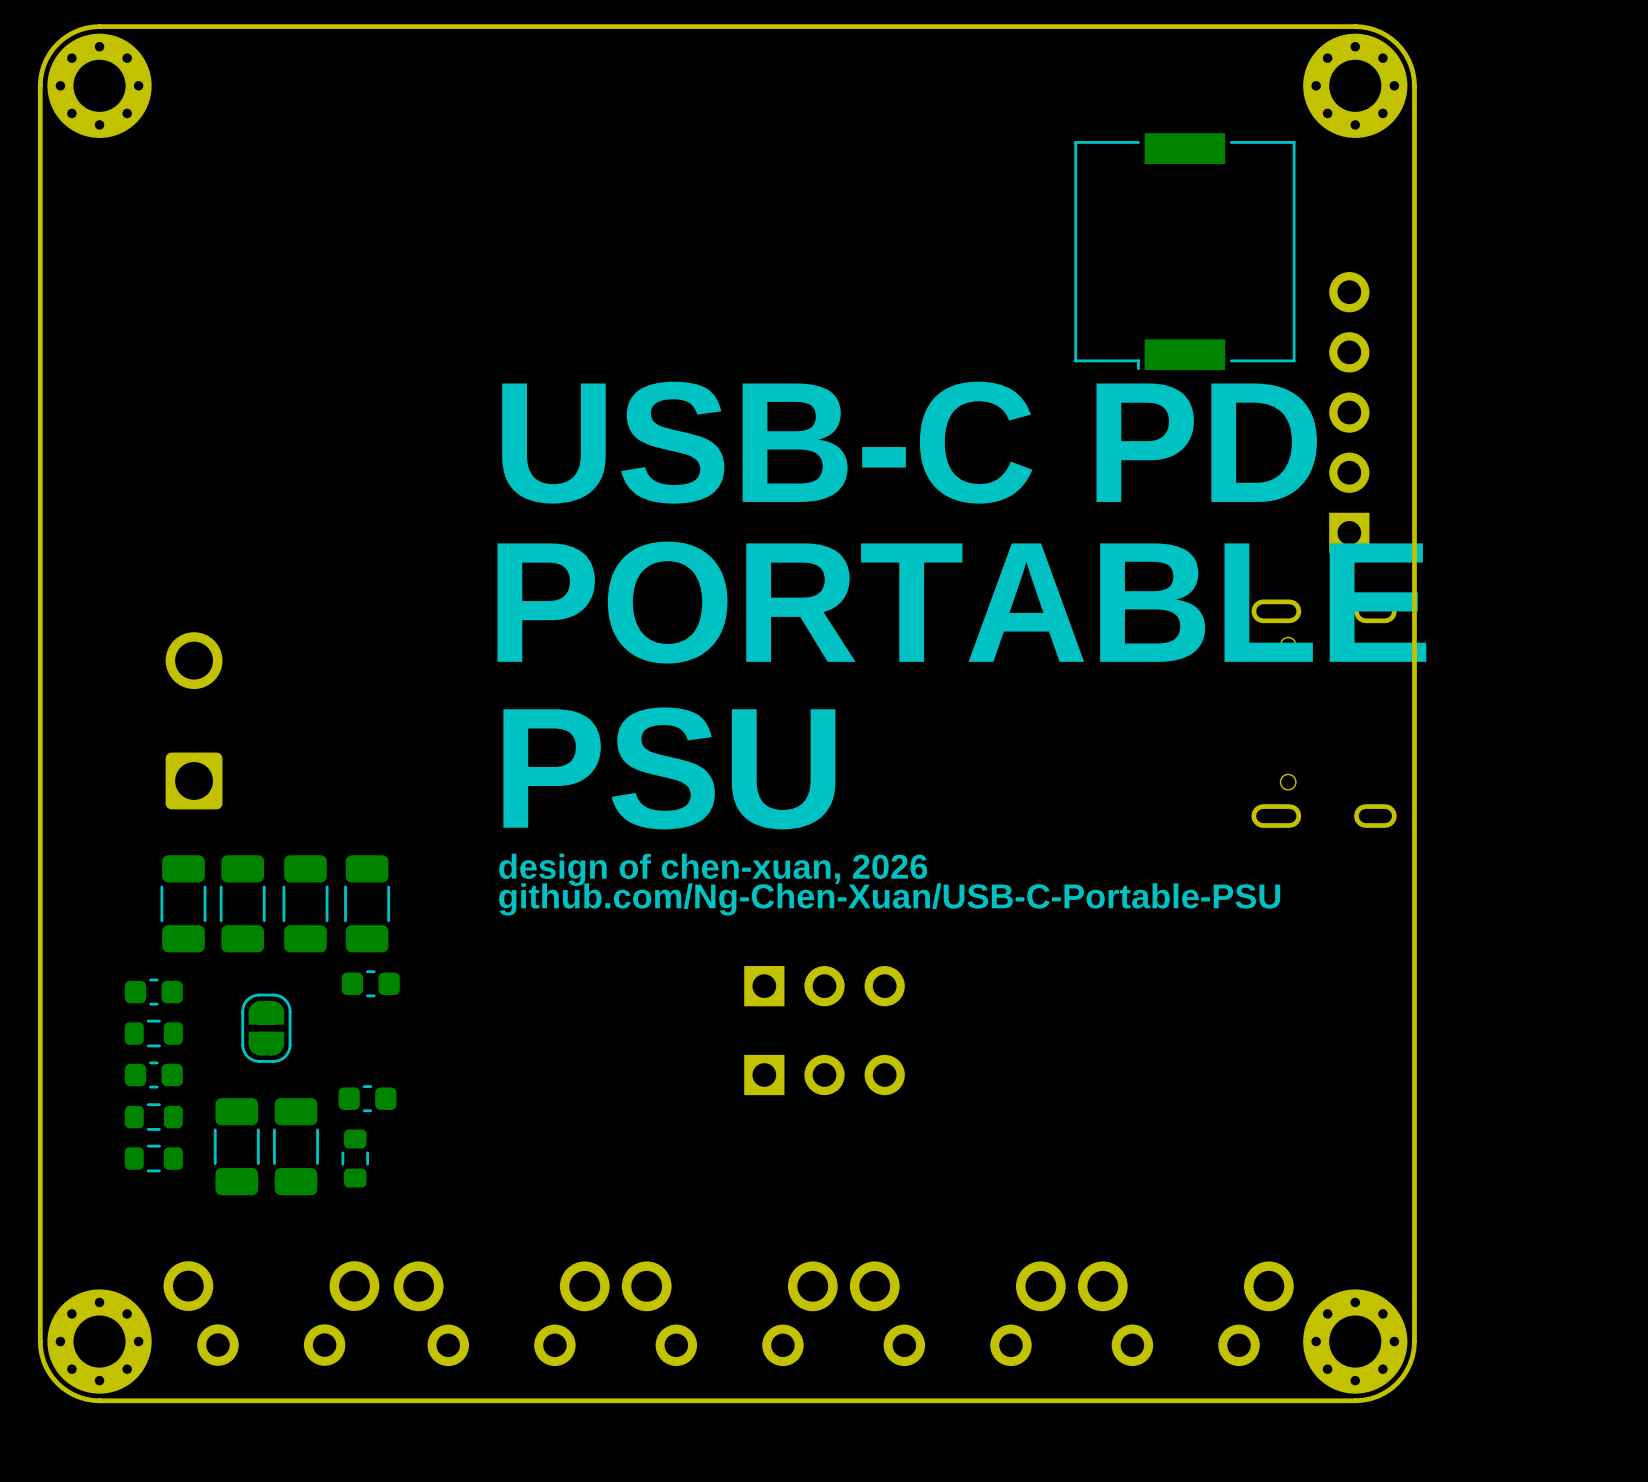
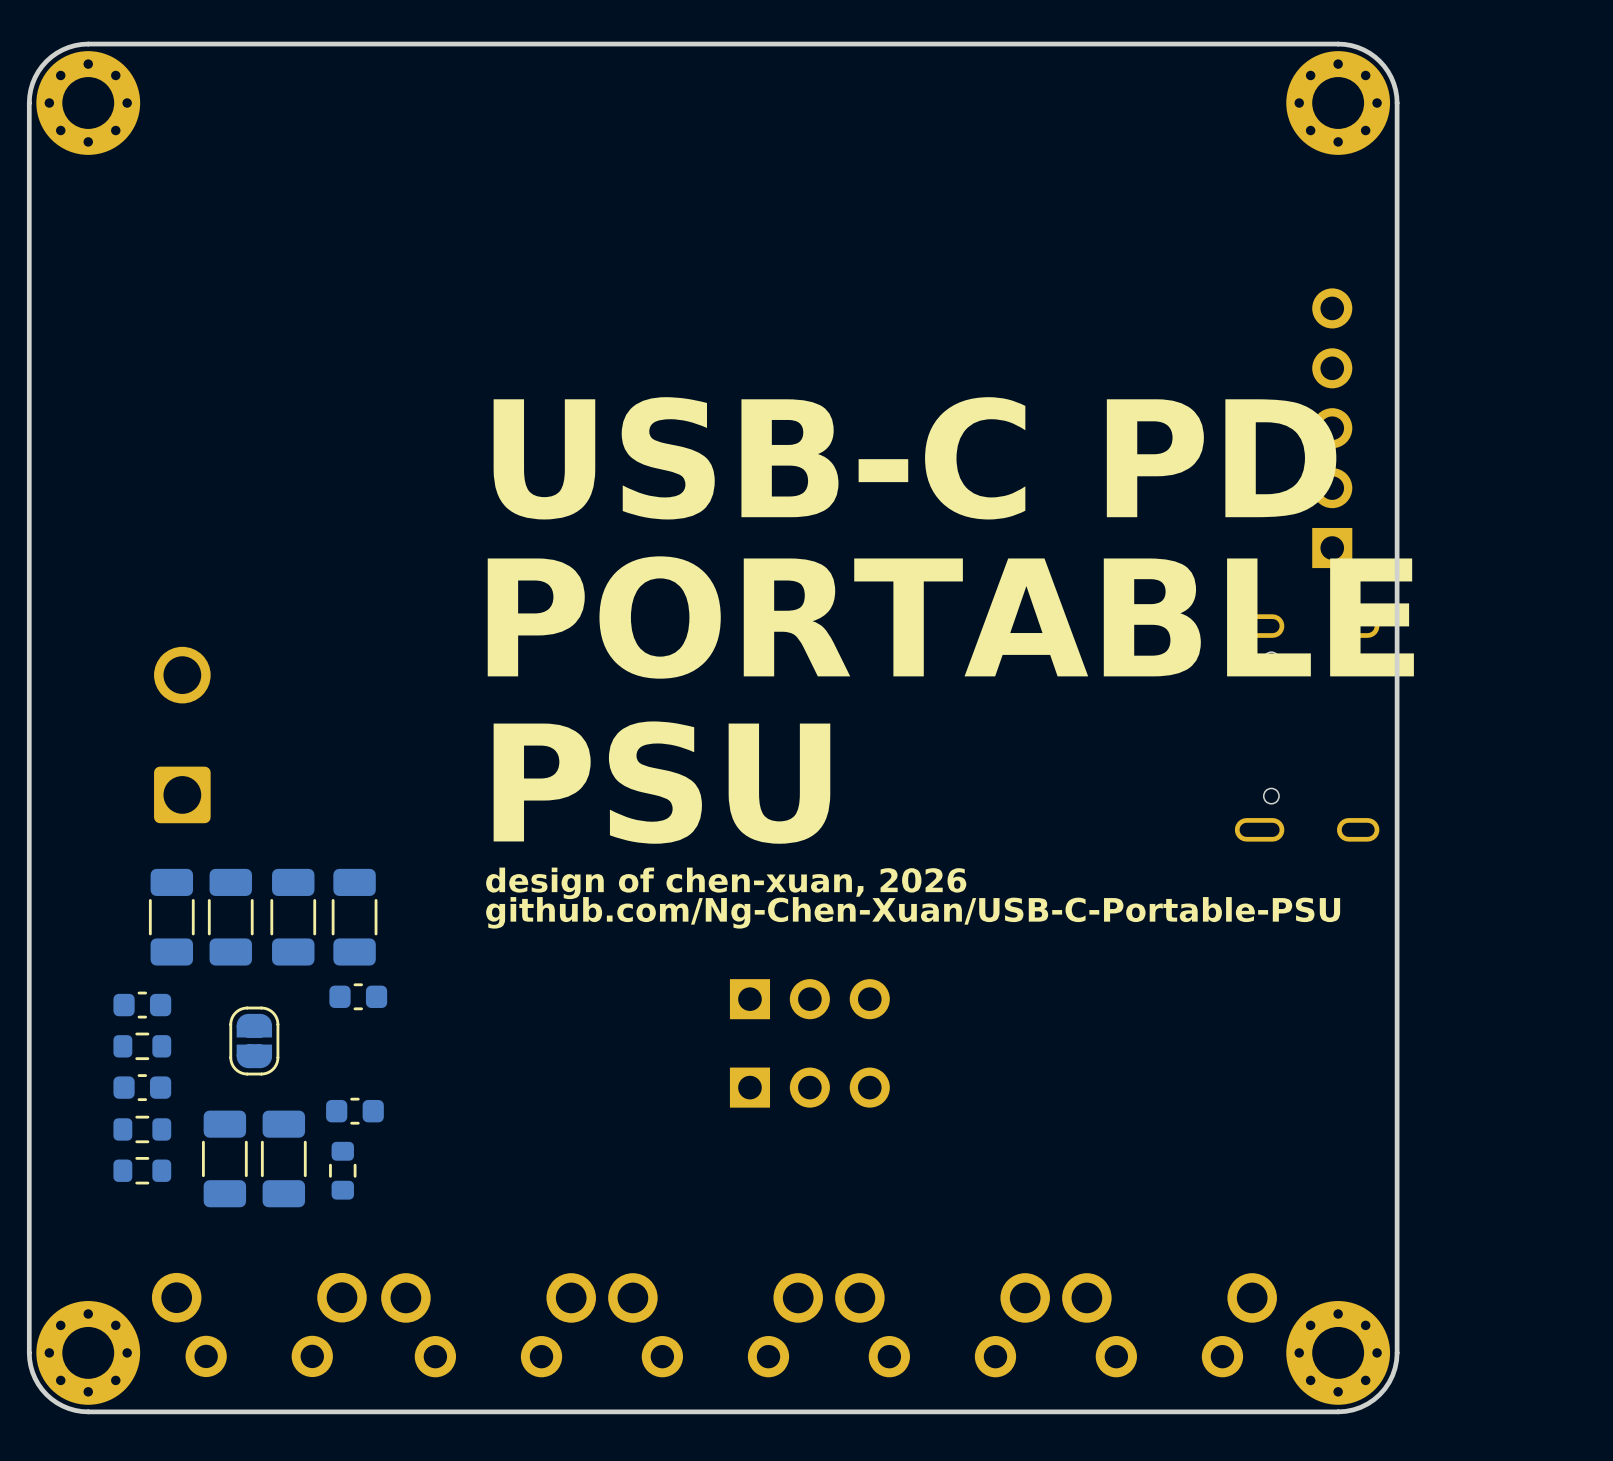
part: (1184, 251) -> none

